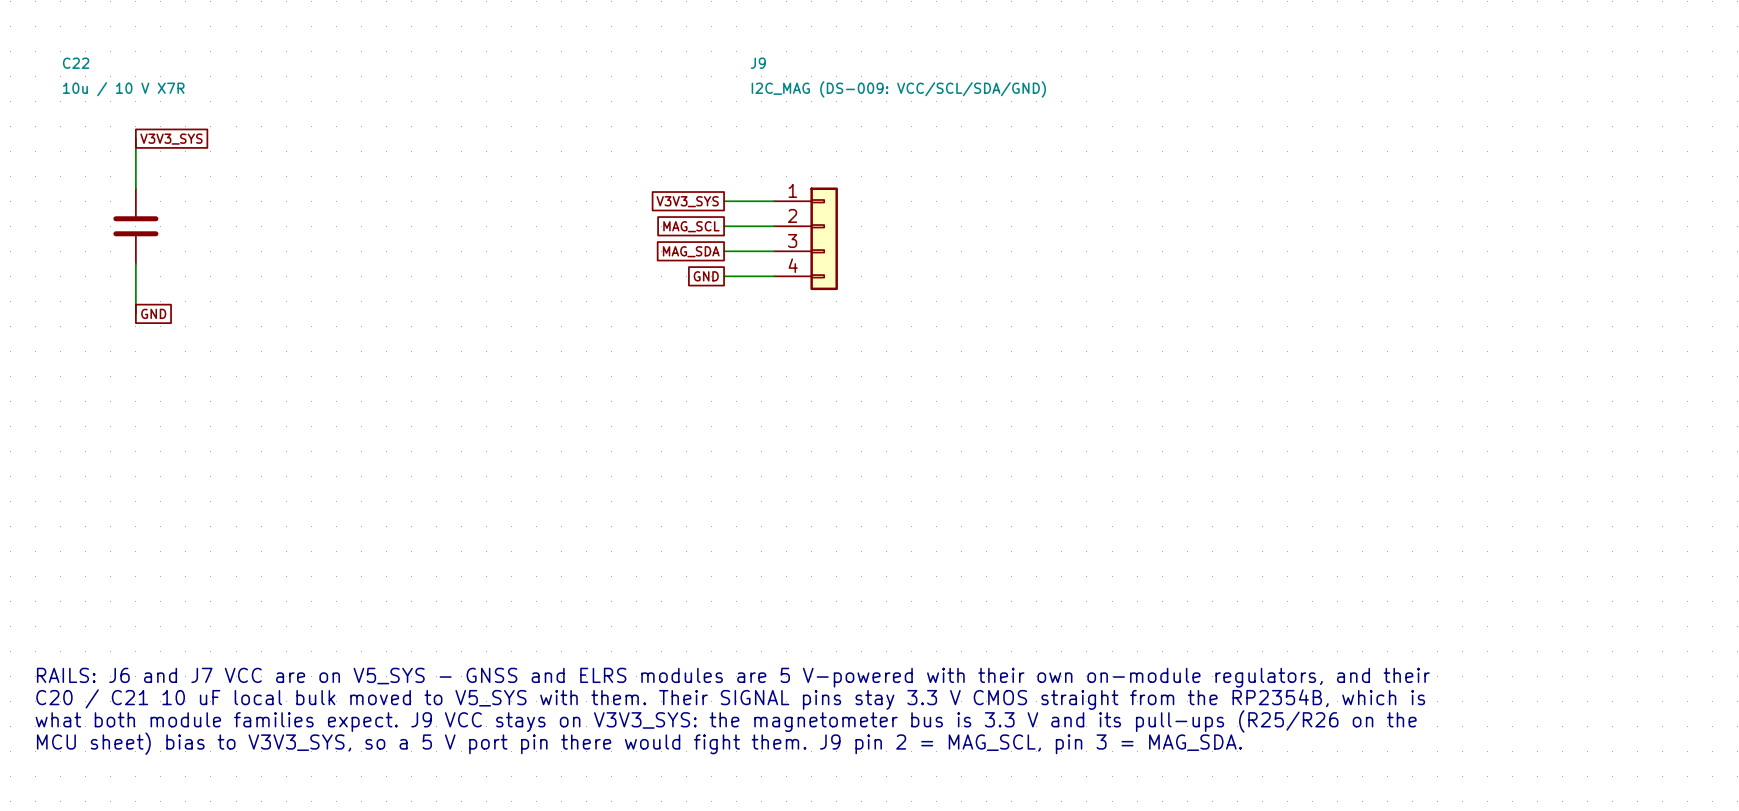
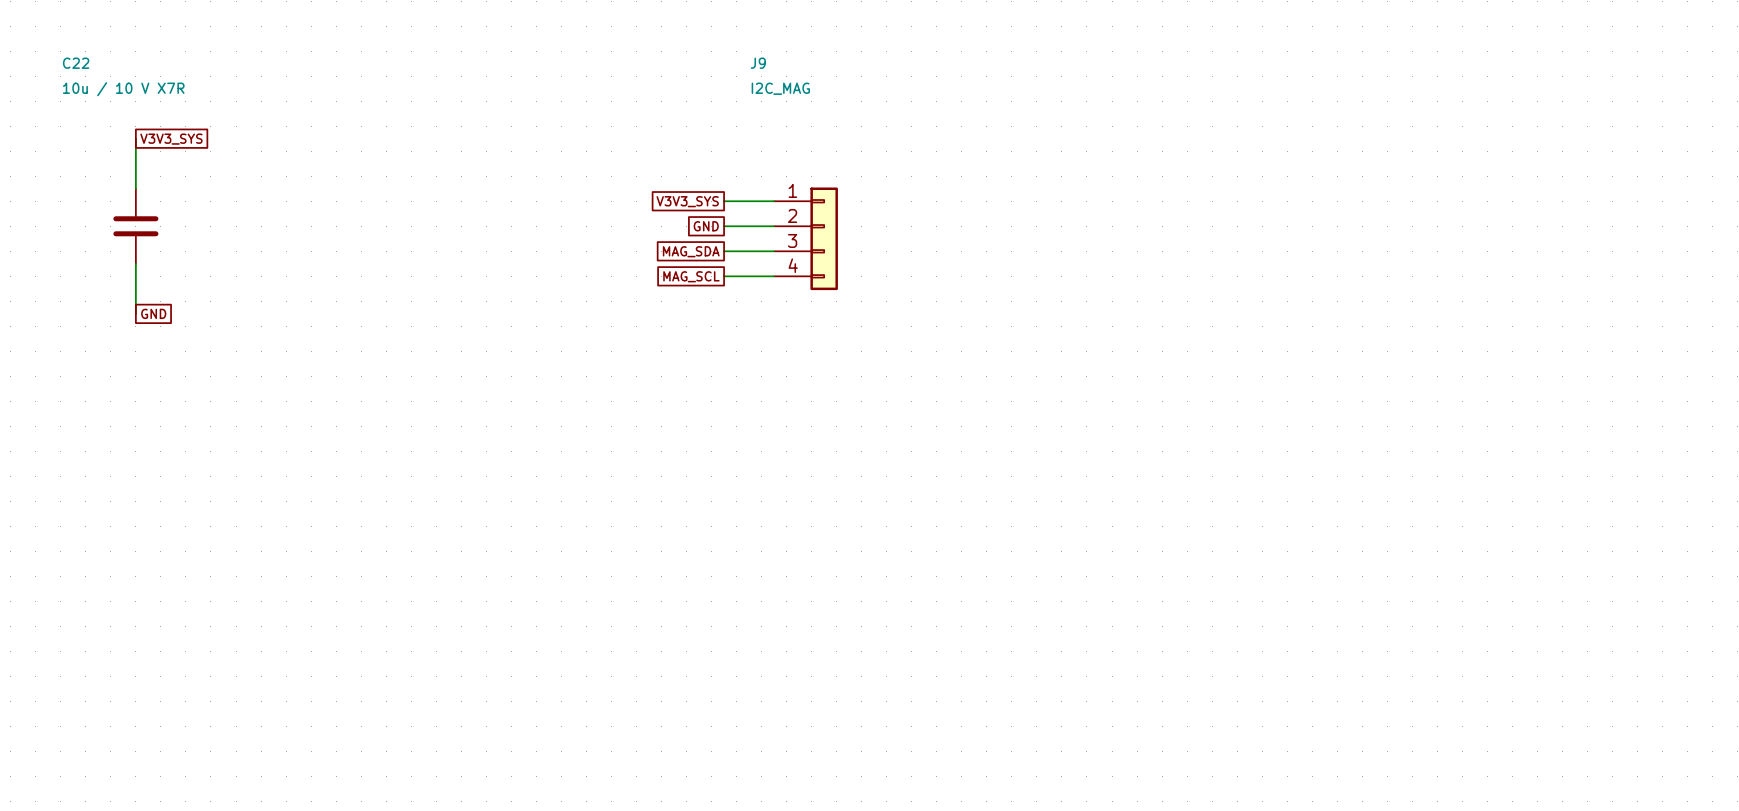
J9 value: I2C_MAG (DS-009: VCC/SCL/SDA/GND) (898, 89) -> I2C_MAG (780, 88)
global label: MAG_SCL (691, 226) -> GND (706, 226)
global label: GND (706, 276) -> MAG_SCL (691, 276)
text: RAILS: J6 and J7 VCC are on V5_SYS - GNSS and ELRS modules are 5 V-powered with their own on-module regulators, and their (733, 677) -> none
text: C20 / C21 10 uF local bulk moved to V5_SYS with them. Their SIGNAL pins stay 3.3 V CMOS straight from the RP2354B, which is (730, 699) -> none
text: what both module families expect. J9 VCC stays on V3V3_SYS: the magnetometer bus is 3.3 V and its pull-ups (R25/R26 on the (726, 721) -> none
text: MCU sheet) bias to V3V3_SYS, so a 5 V port pin there would fight them. J9 pin 2 = MAG_SCL, pin 3 = MAG_SDA. (639, 743) -> none

